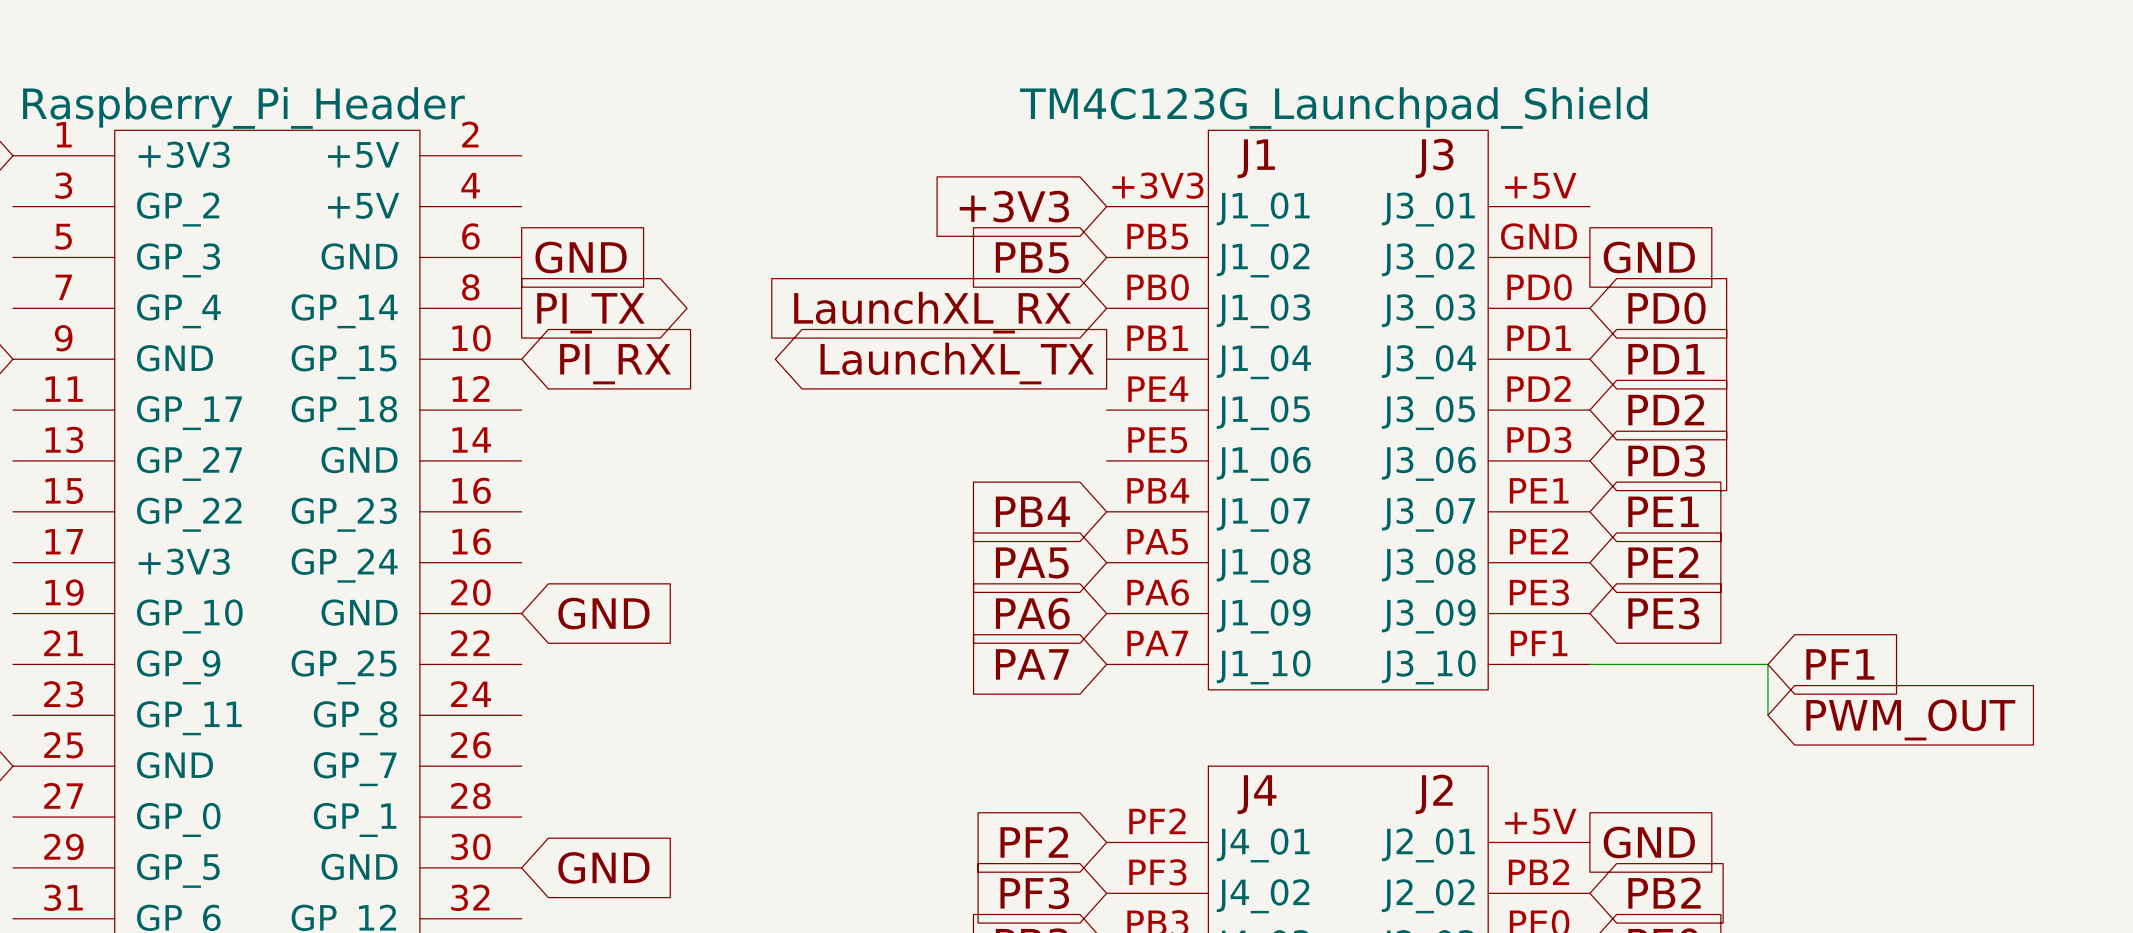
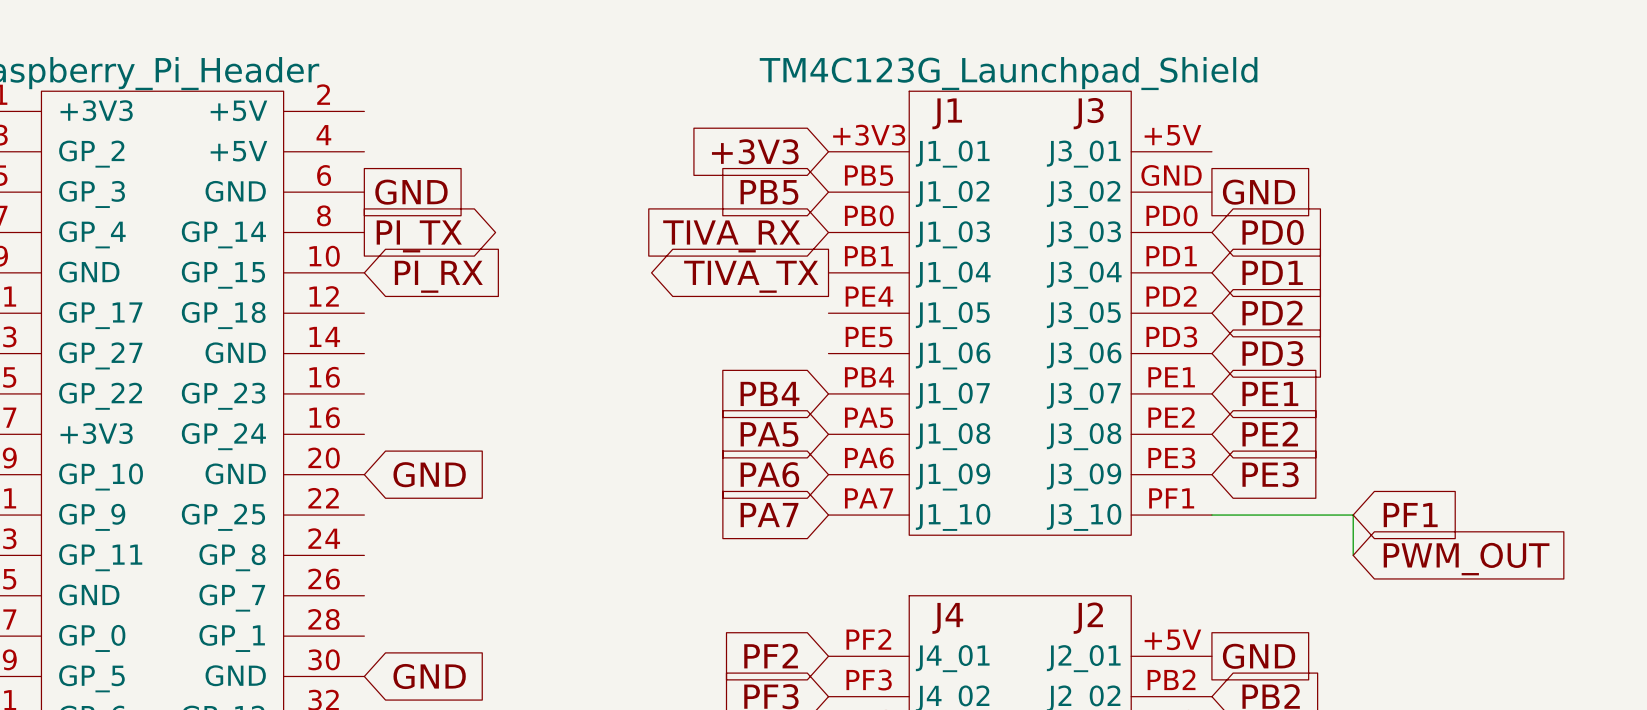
global label: LaunchXL_RX (932, 312) -> TIVA_RX (731, 236)
global label: LaunchXL_TX (957, 363) -> TIVA_TX (751, 276)

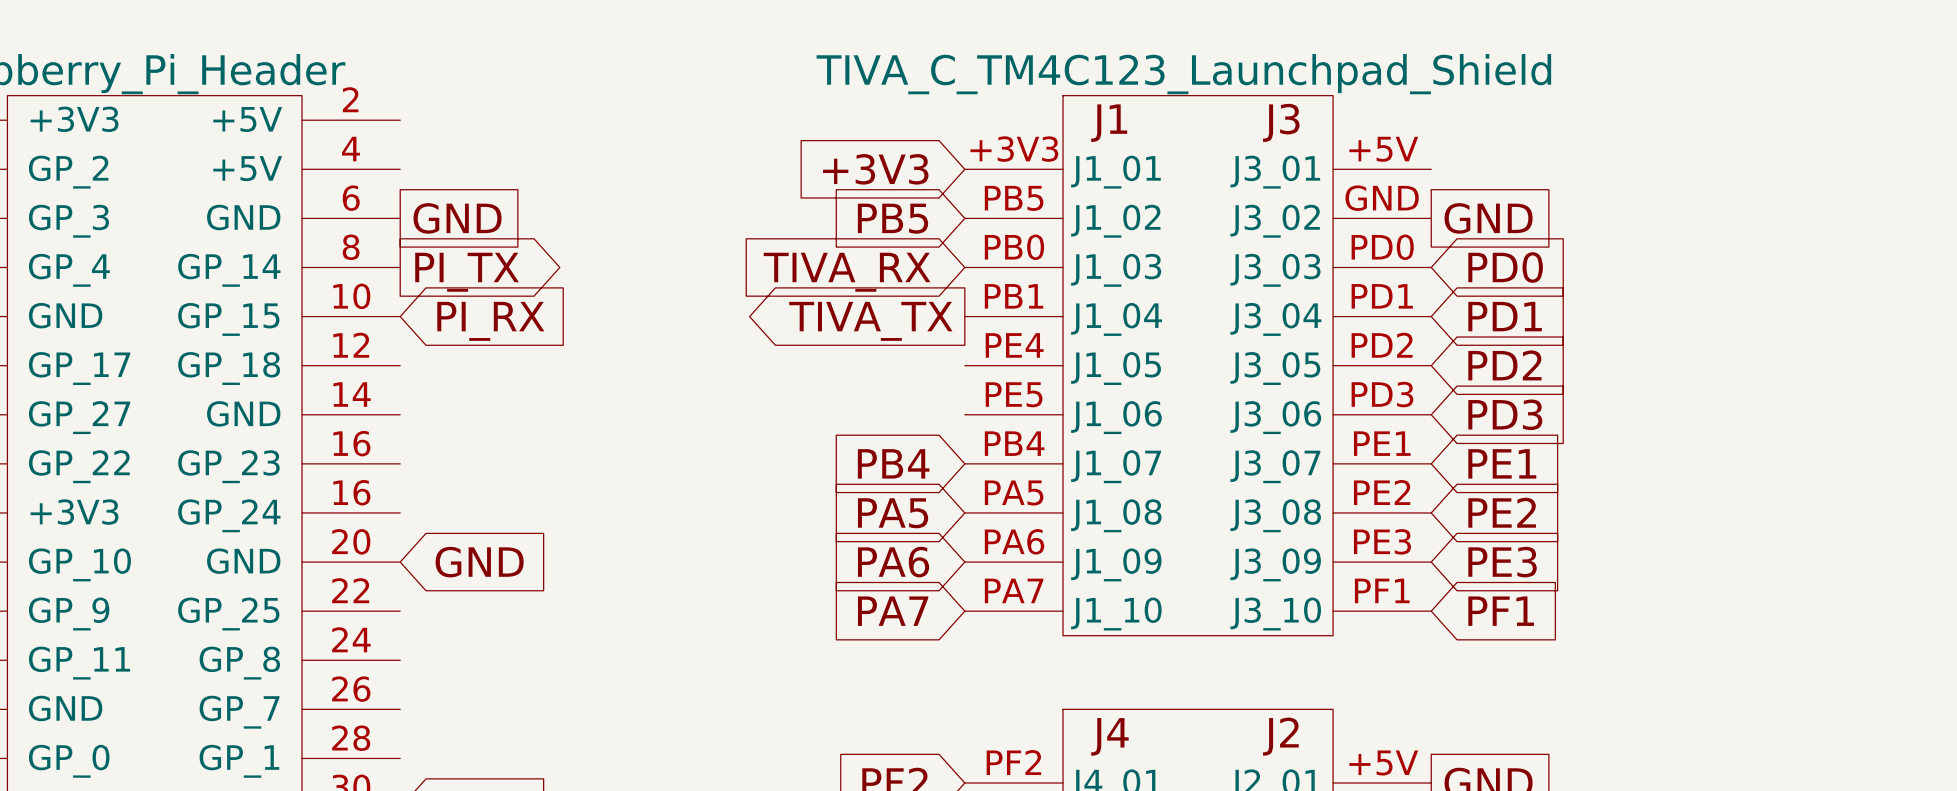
part value: TM4C123G_Launchpad_Shield (1008, 73) -> TIVA_C_TM4C123_Launchpad_Shield (1183, 74)
wire: (1211, 515) (1353, 515) (1353, 555) -> none
global label position: PF1 (1410, 515) -> PF1 (1501, 611)
global label: PWM_OUT (1466, 559) -> none

